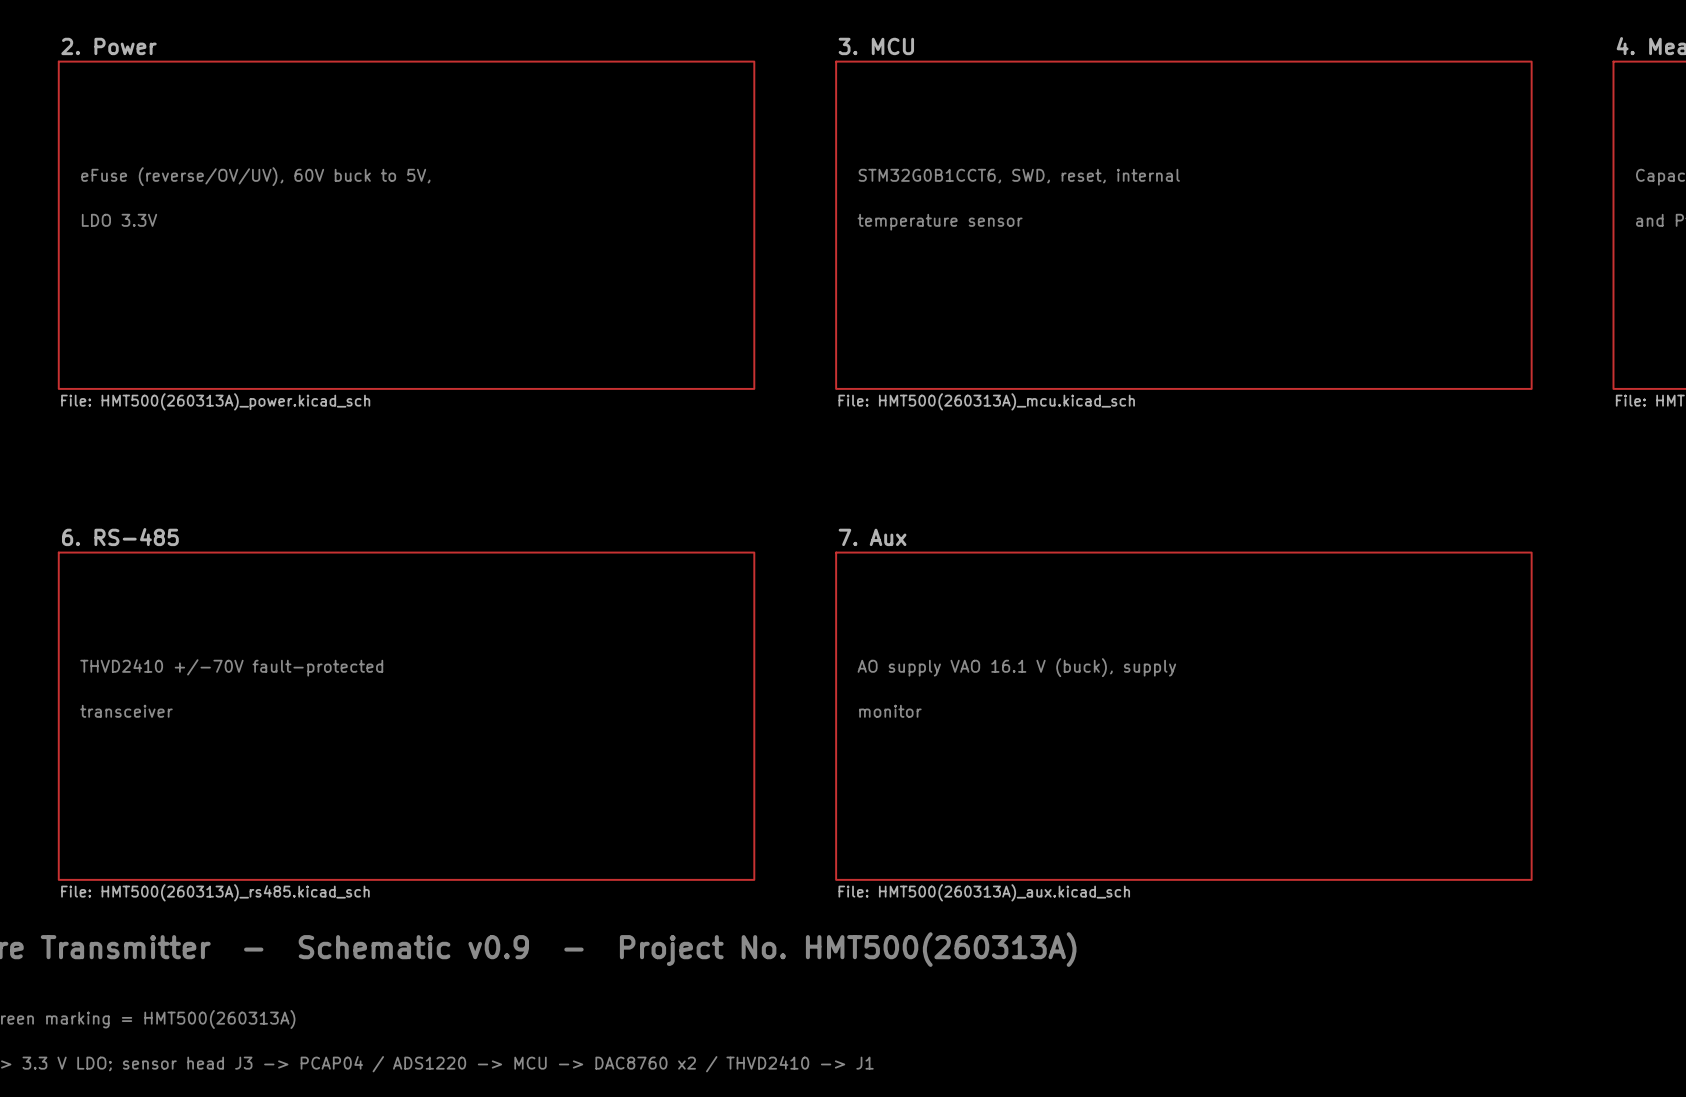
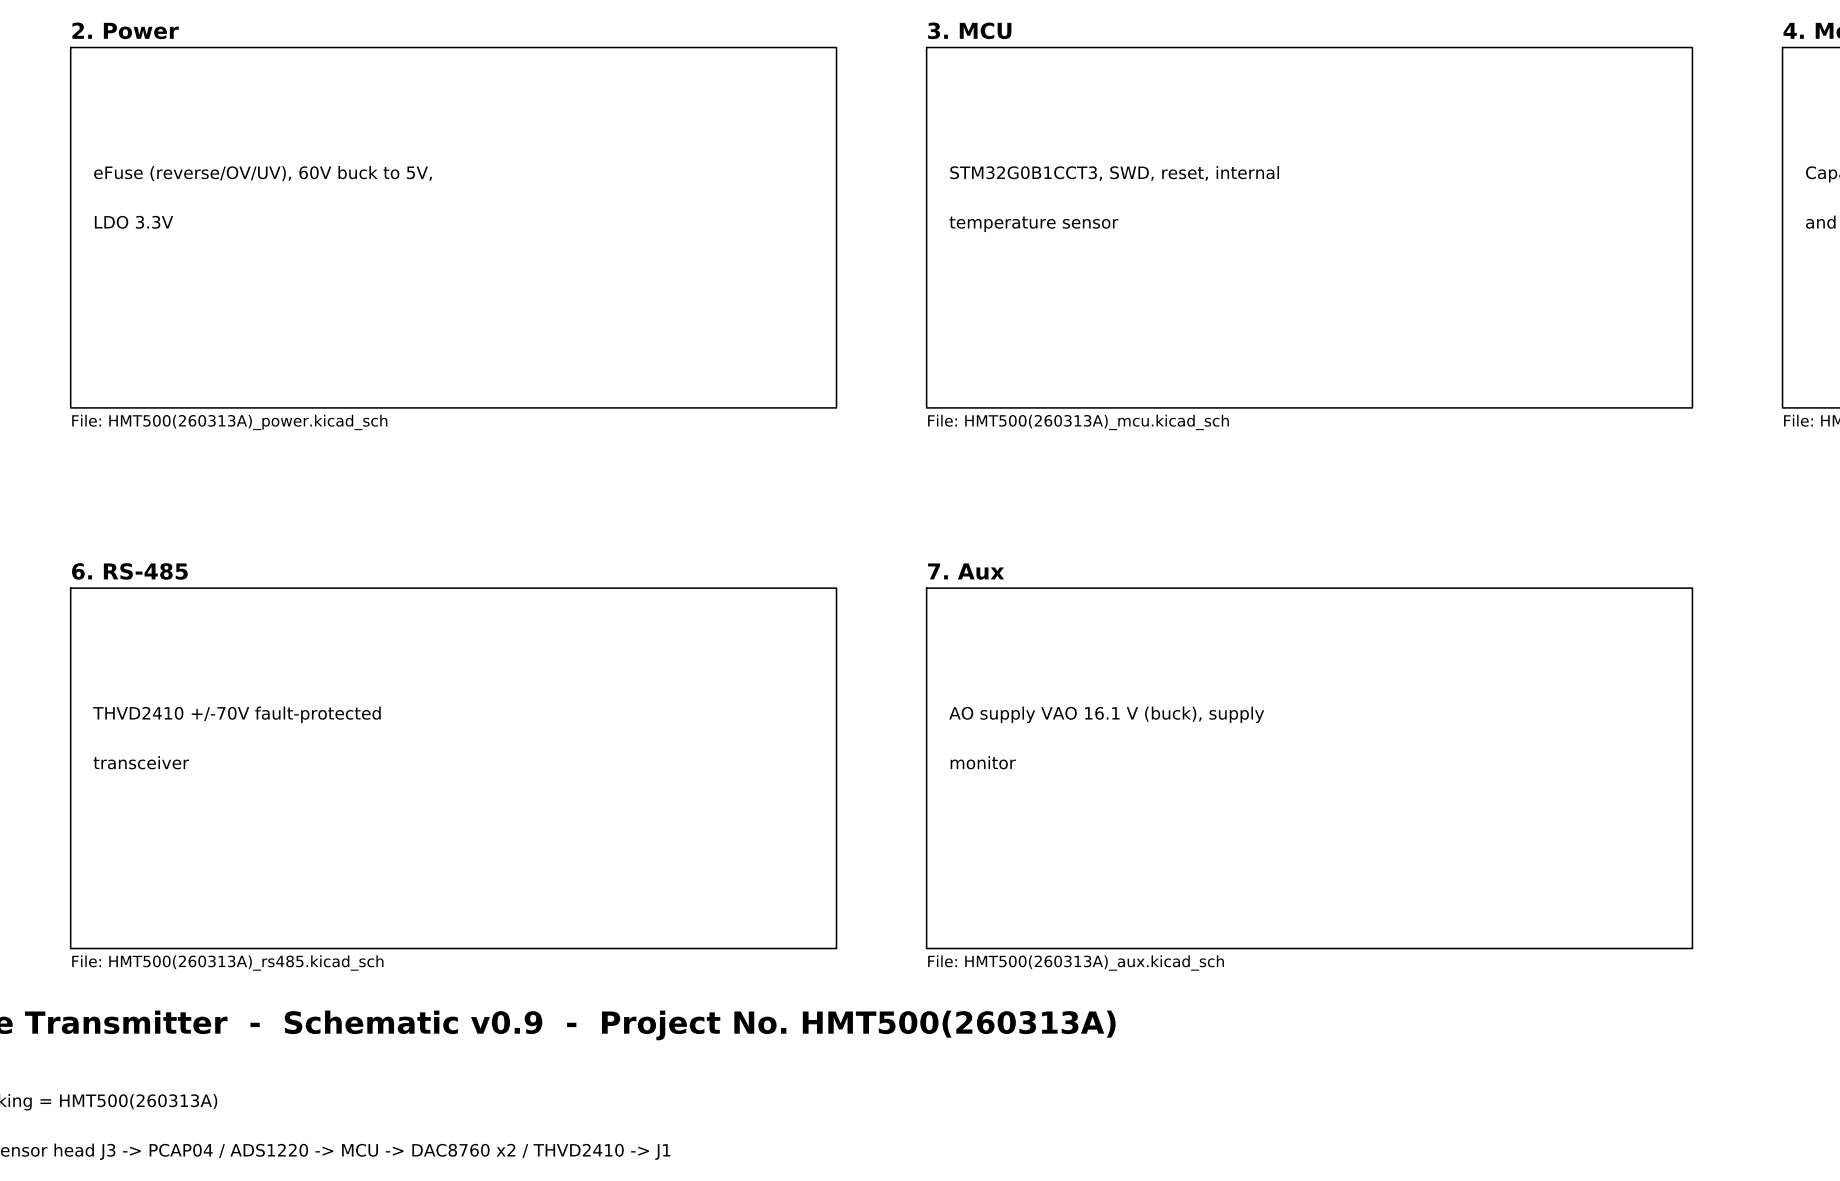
text: STM32G0B1CCT6, SWD, reset, internal (1019, 176) -> STM32G0B1CCT3, SWD, reset, internal (1114, 173)

